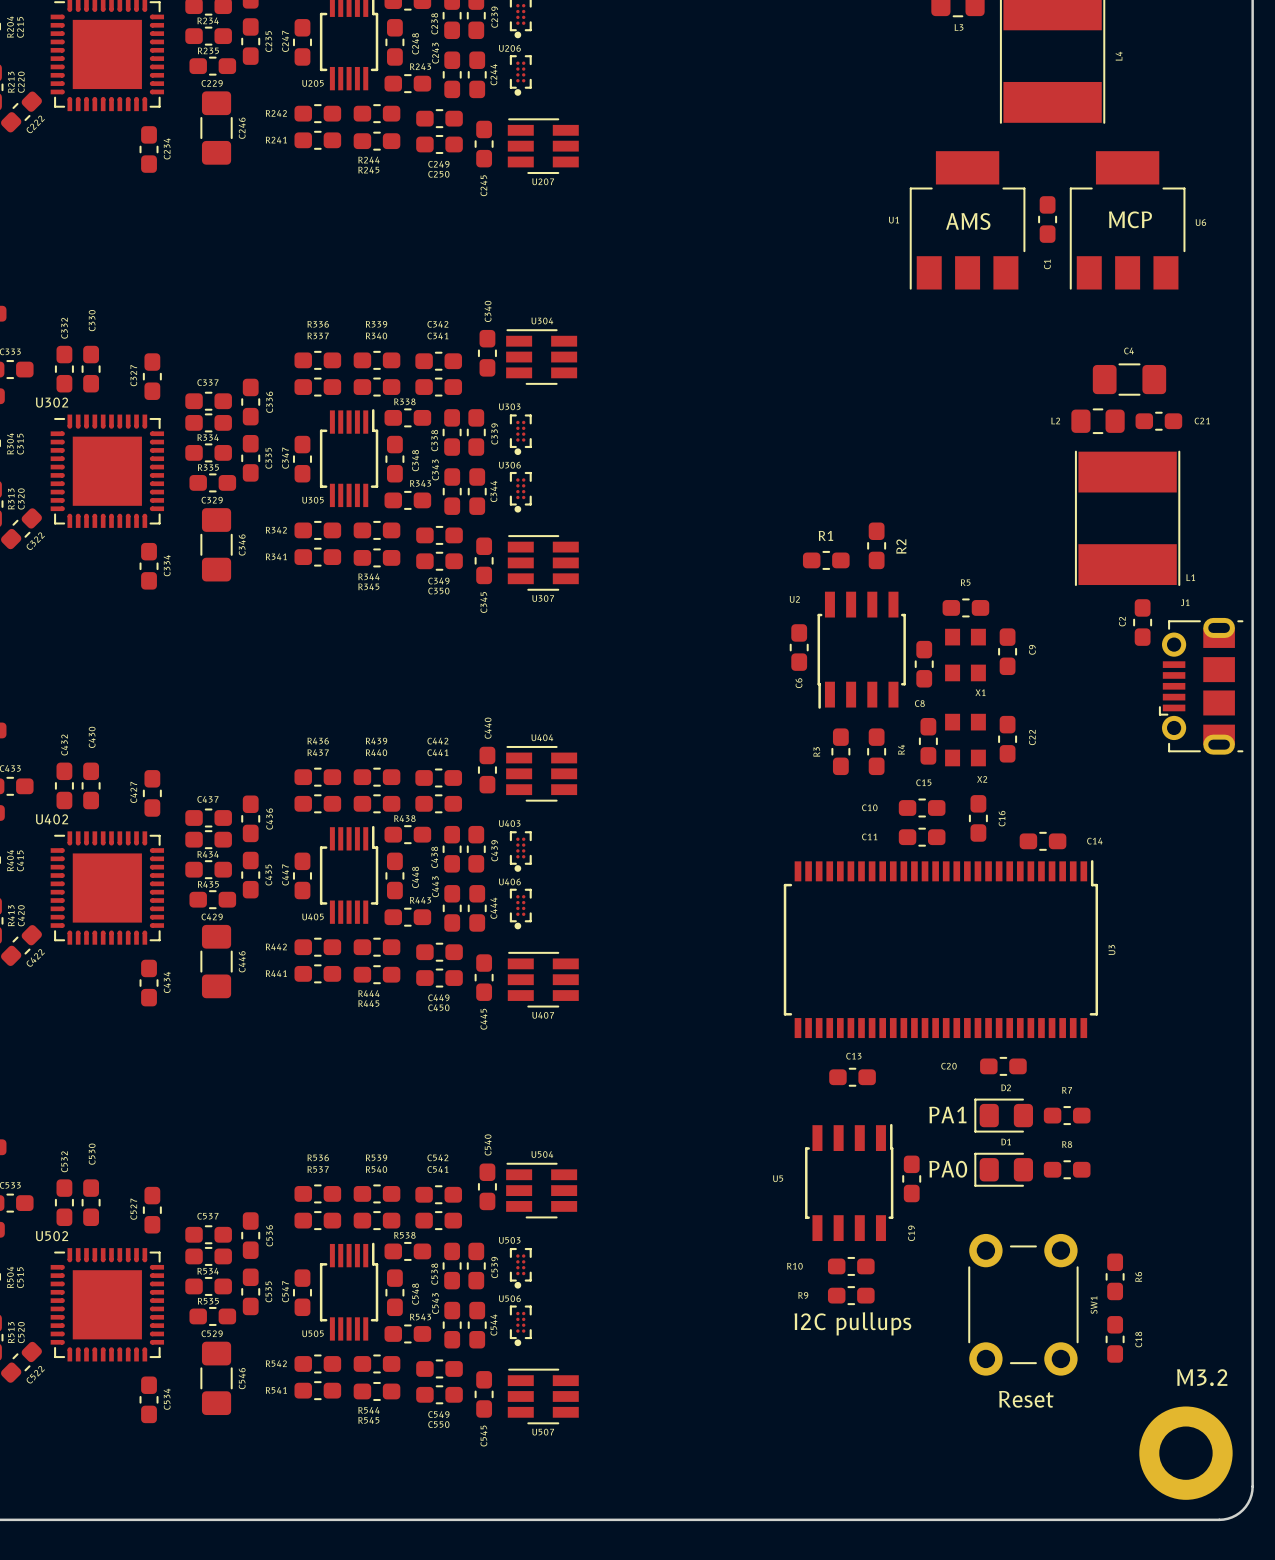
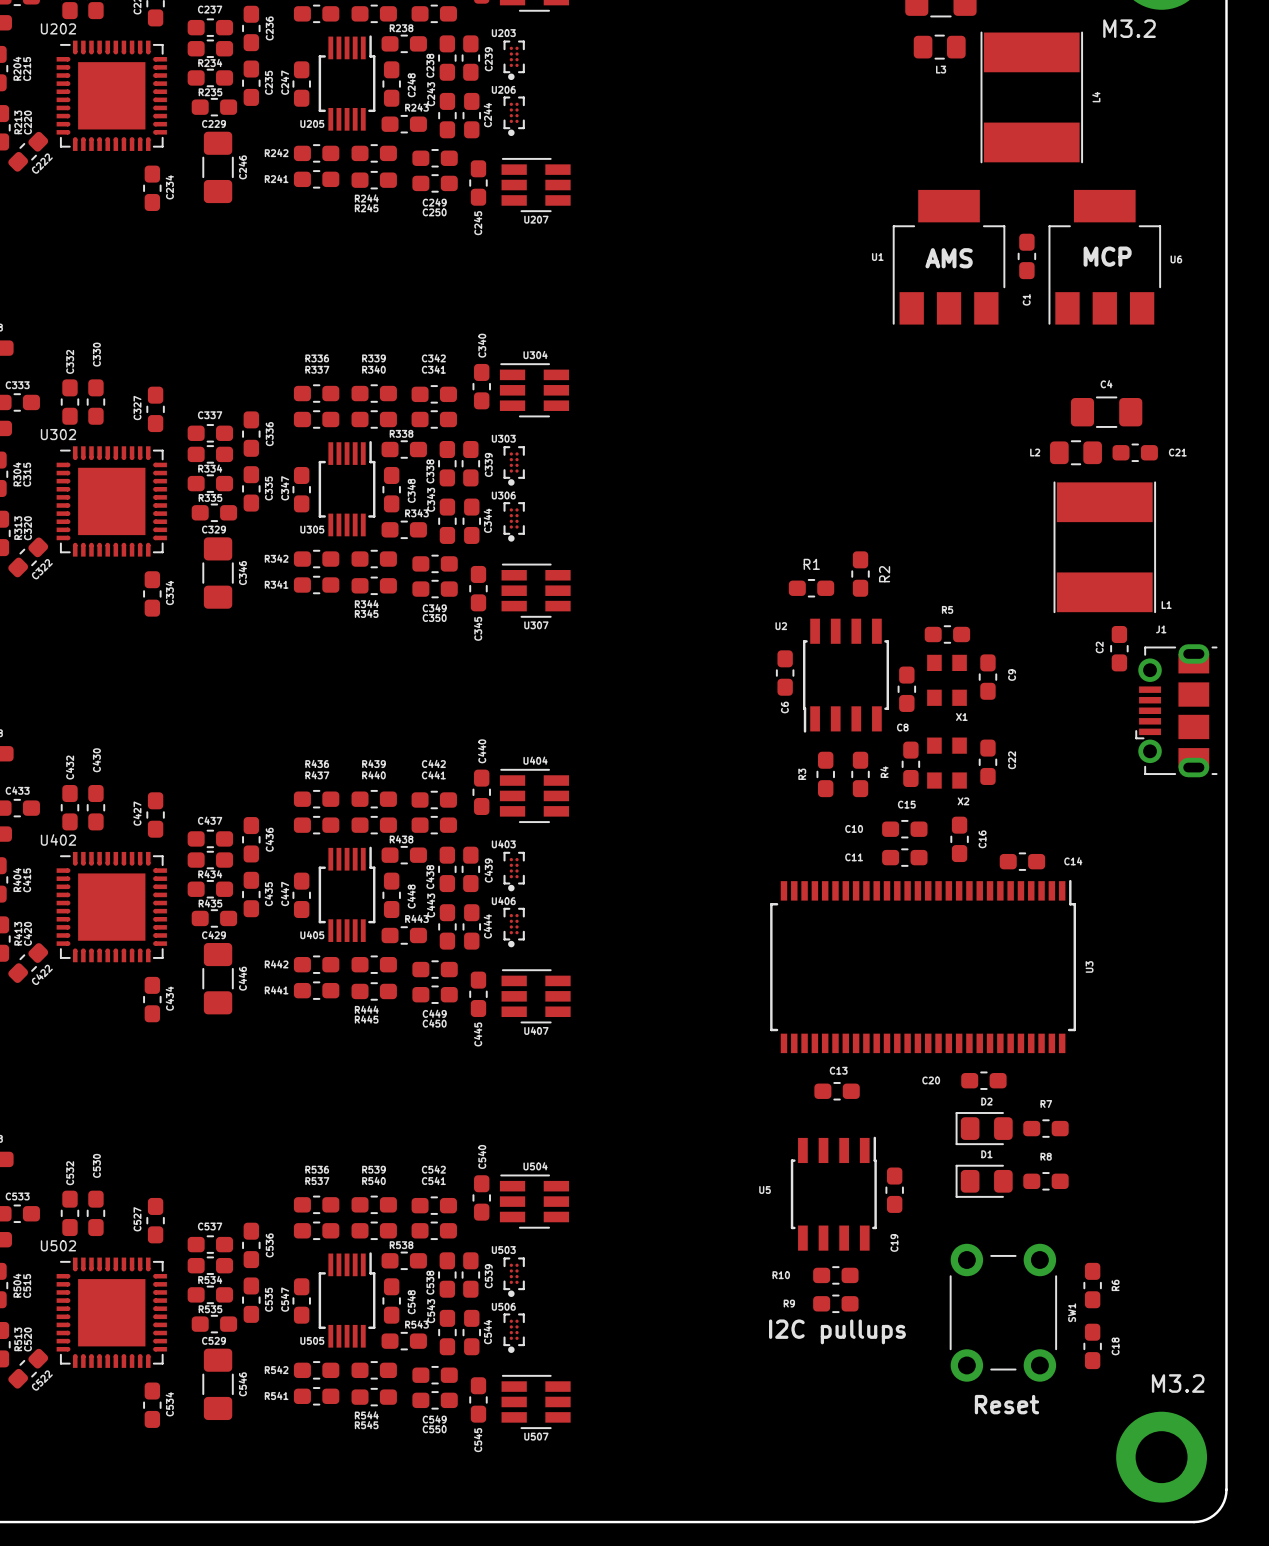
text: PA1 (947, 1114) -> none
text: PA0 (948, 1169) -> none

